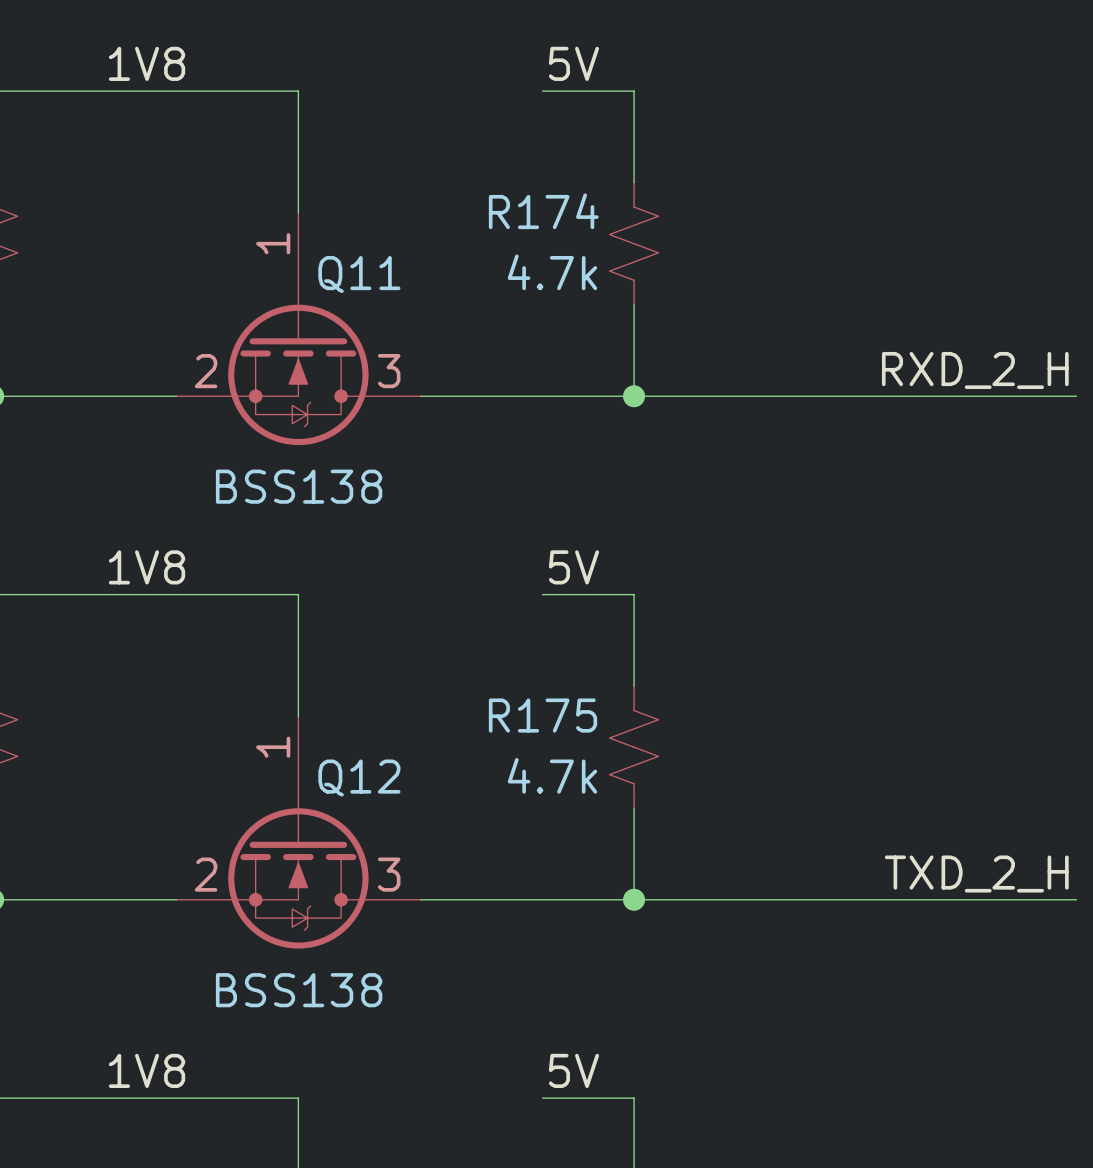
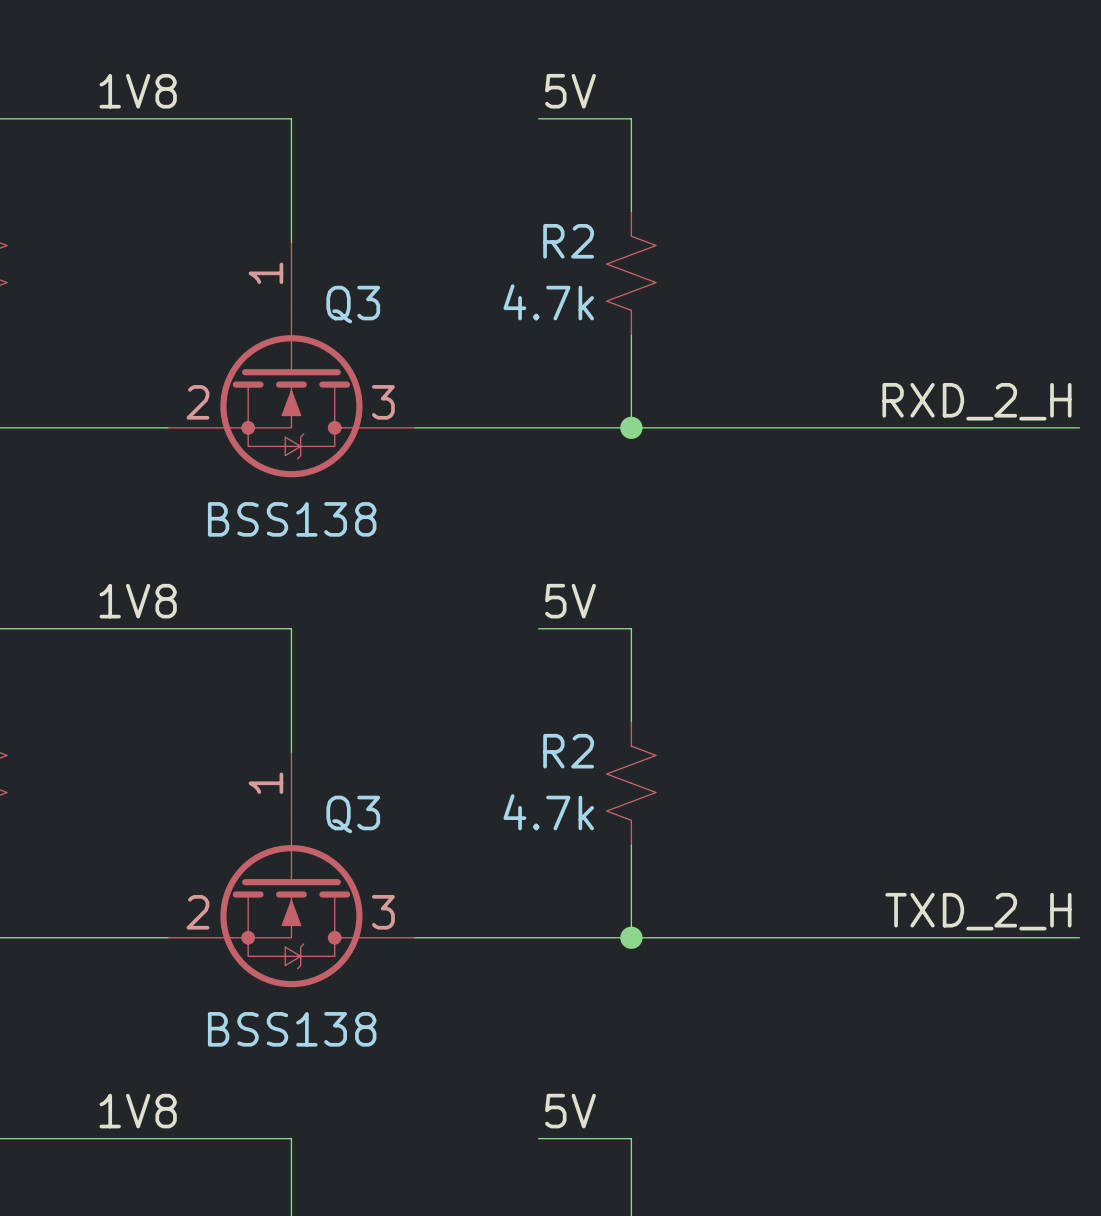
R174 name: R174 (543, 211) -> R2 (568, 241)
Q11 name: Q11 (359, 274) -> Q3 (353, 304)
R175 name: R175 (543, 715) -> R2 (568, 751)
Q12 name: Q12 (359, 778) -> Q3 (353, 814)

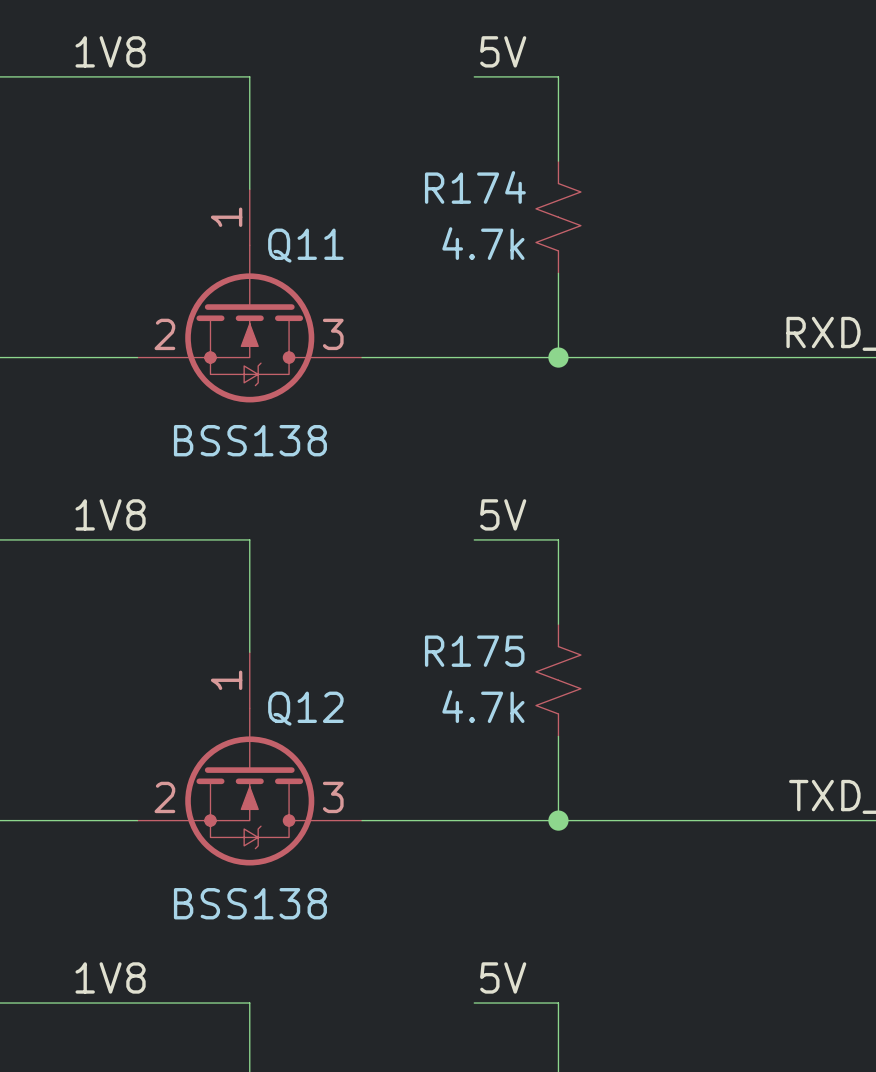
R2 name: R2 (568, 241) -> R174 (475, 187)
Q3 name: Q3 (353, 304) -> Q11 (305, 245)
R2 name: R2 (568, 751) -> R175 (474, 651)
Q3 name: Q3 (353, 814) -> Q12 (305, 708)

